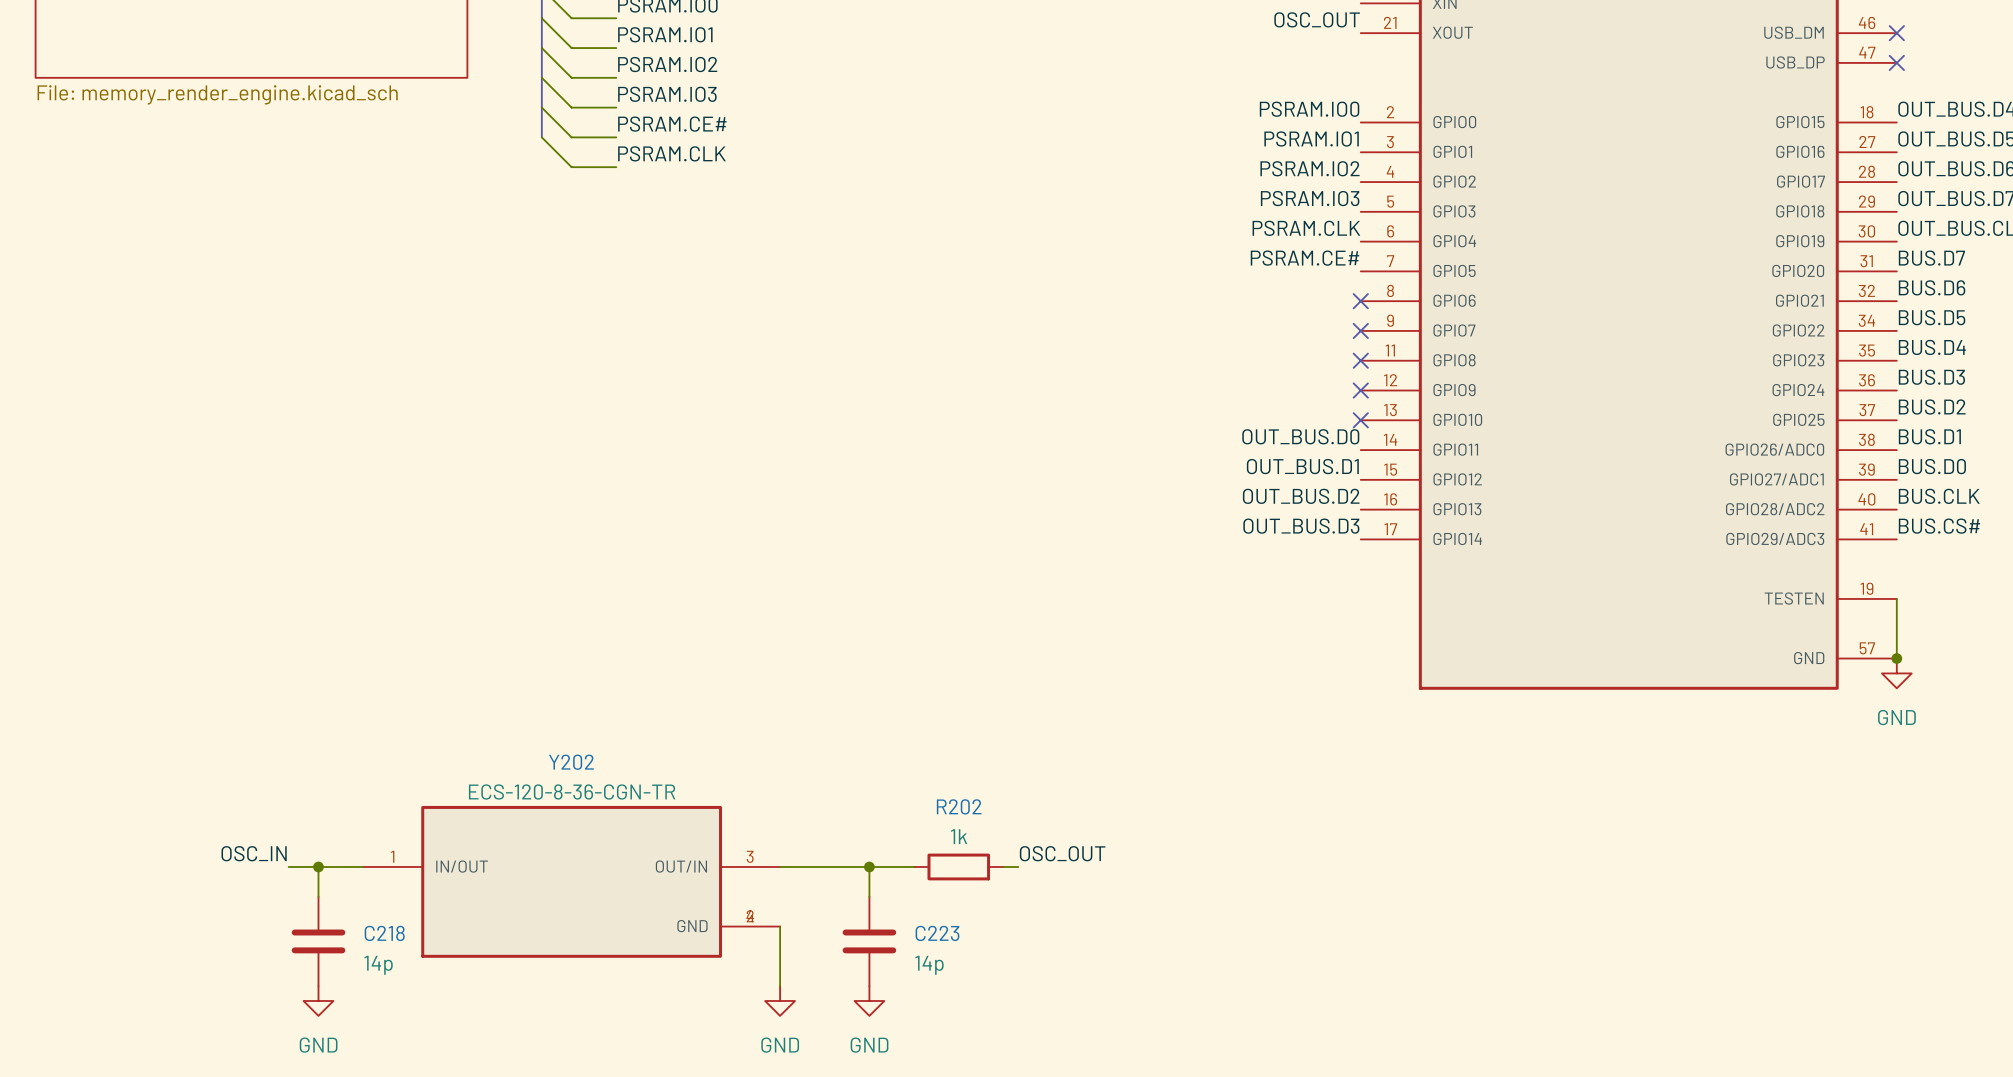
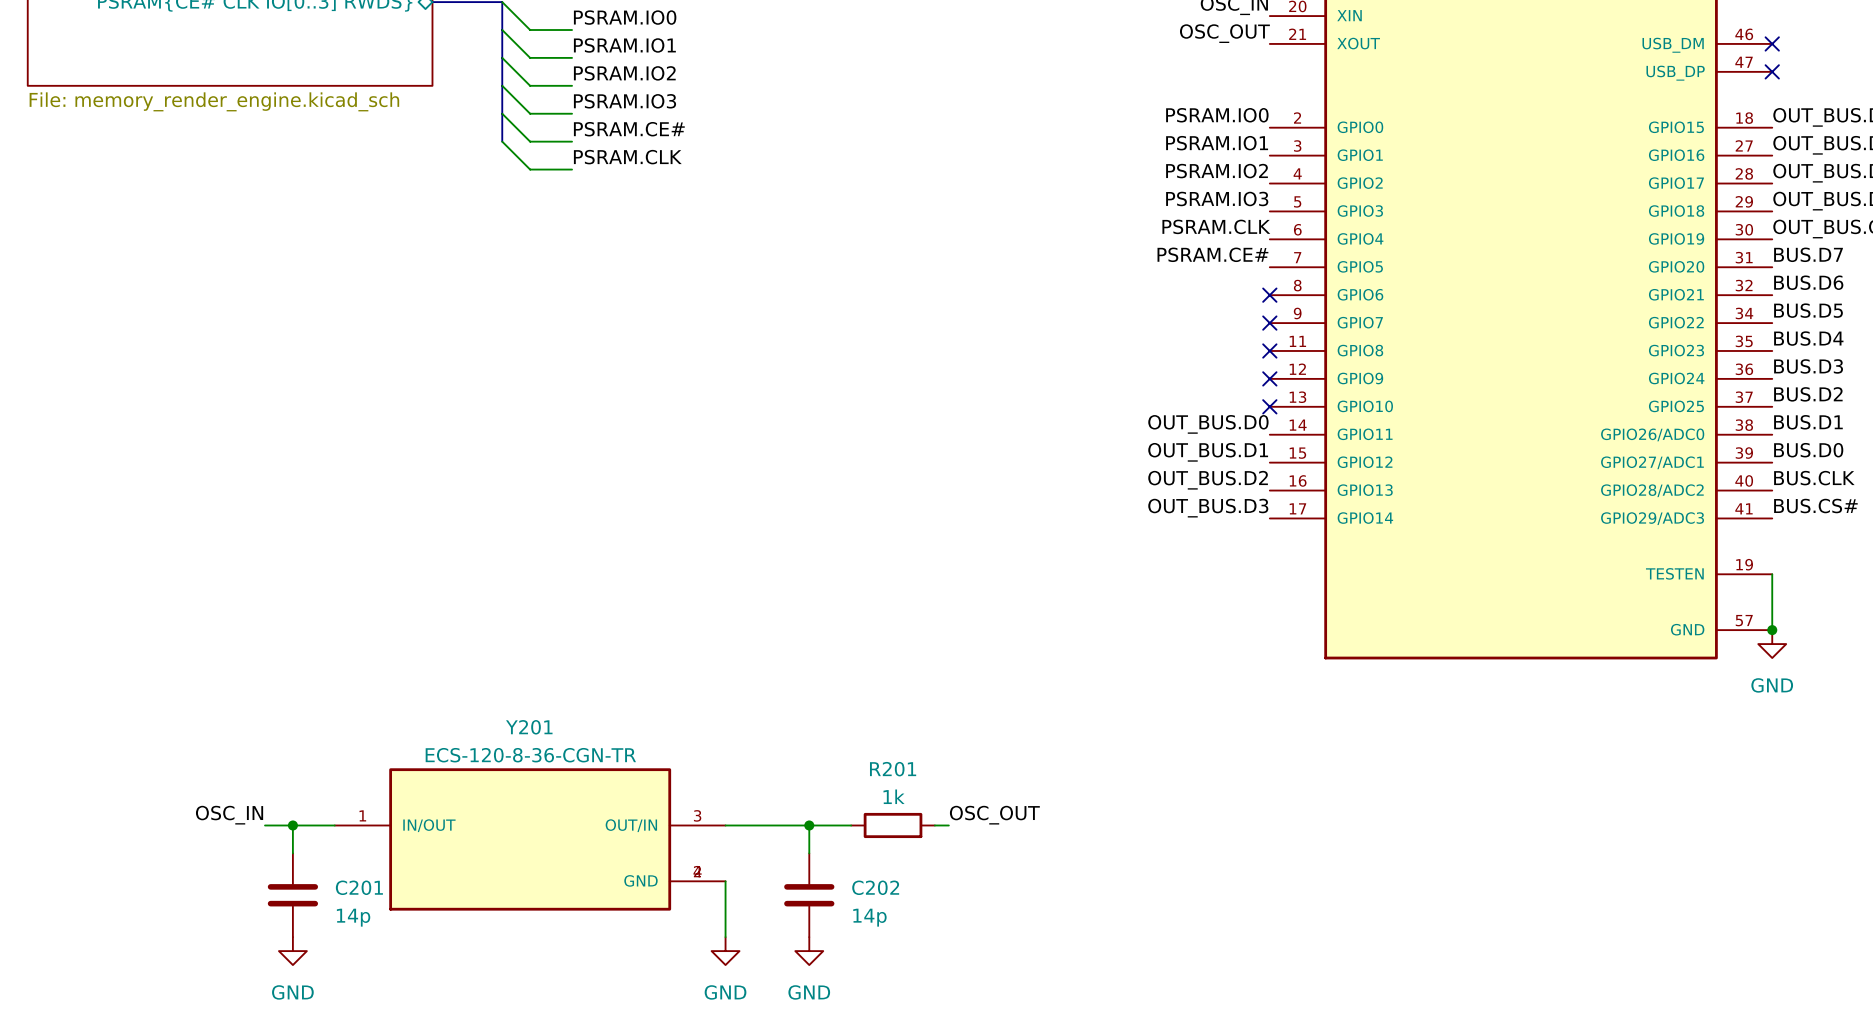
Y202 name: Y202 (571, 762) -> Y201 (529, 727)
R202 name: R202 (959, 806) -> R201 (893, 769)
C218 name: C218 (384, 933) -> C201 (359, 887)
C223 name: C223 (937, 933) -> C202 (875, 887)

